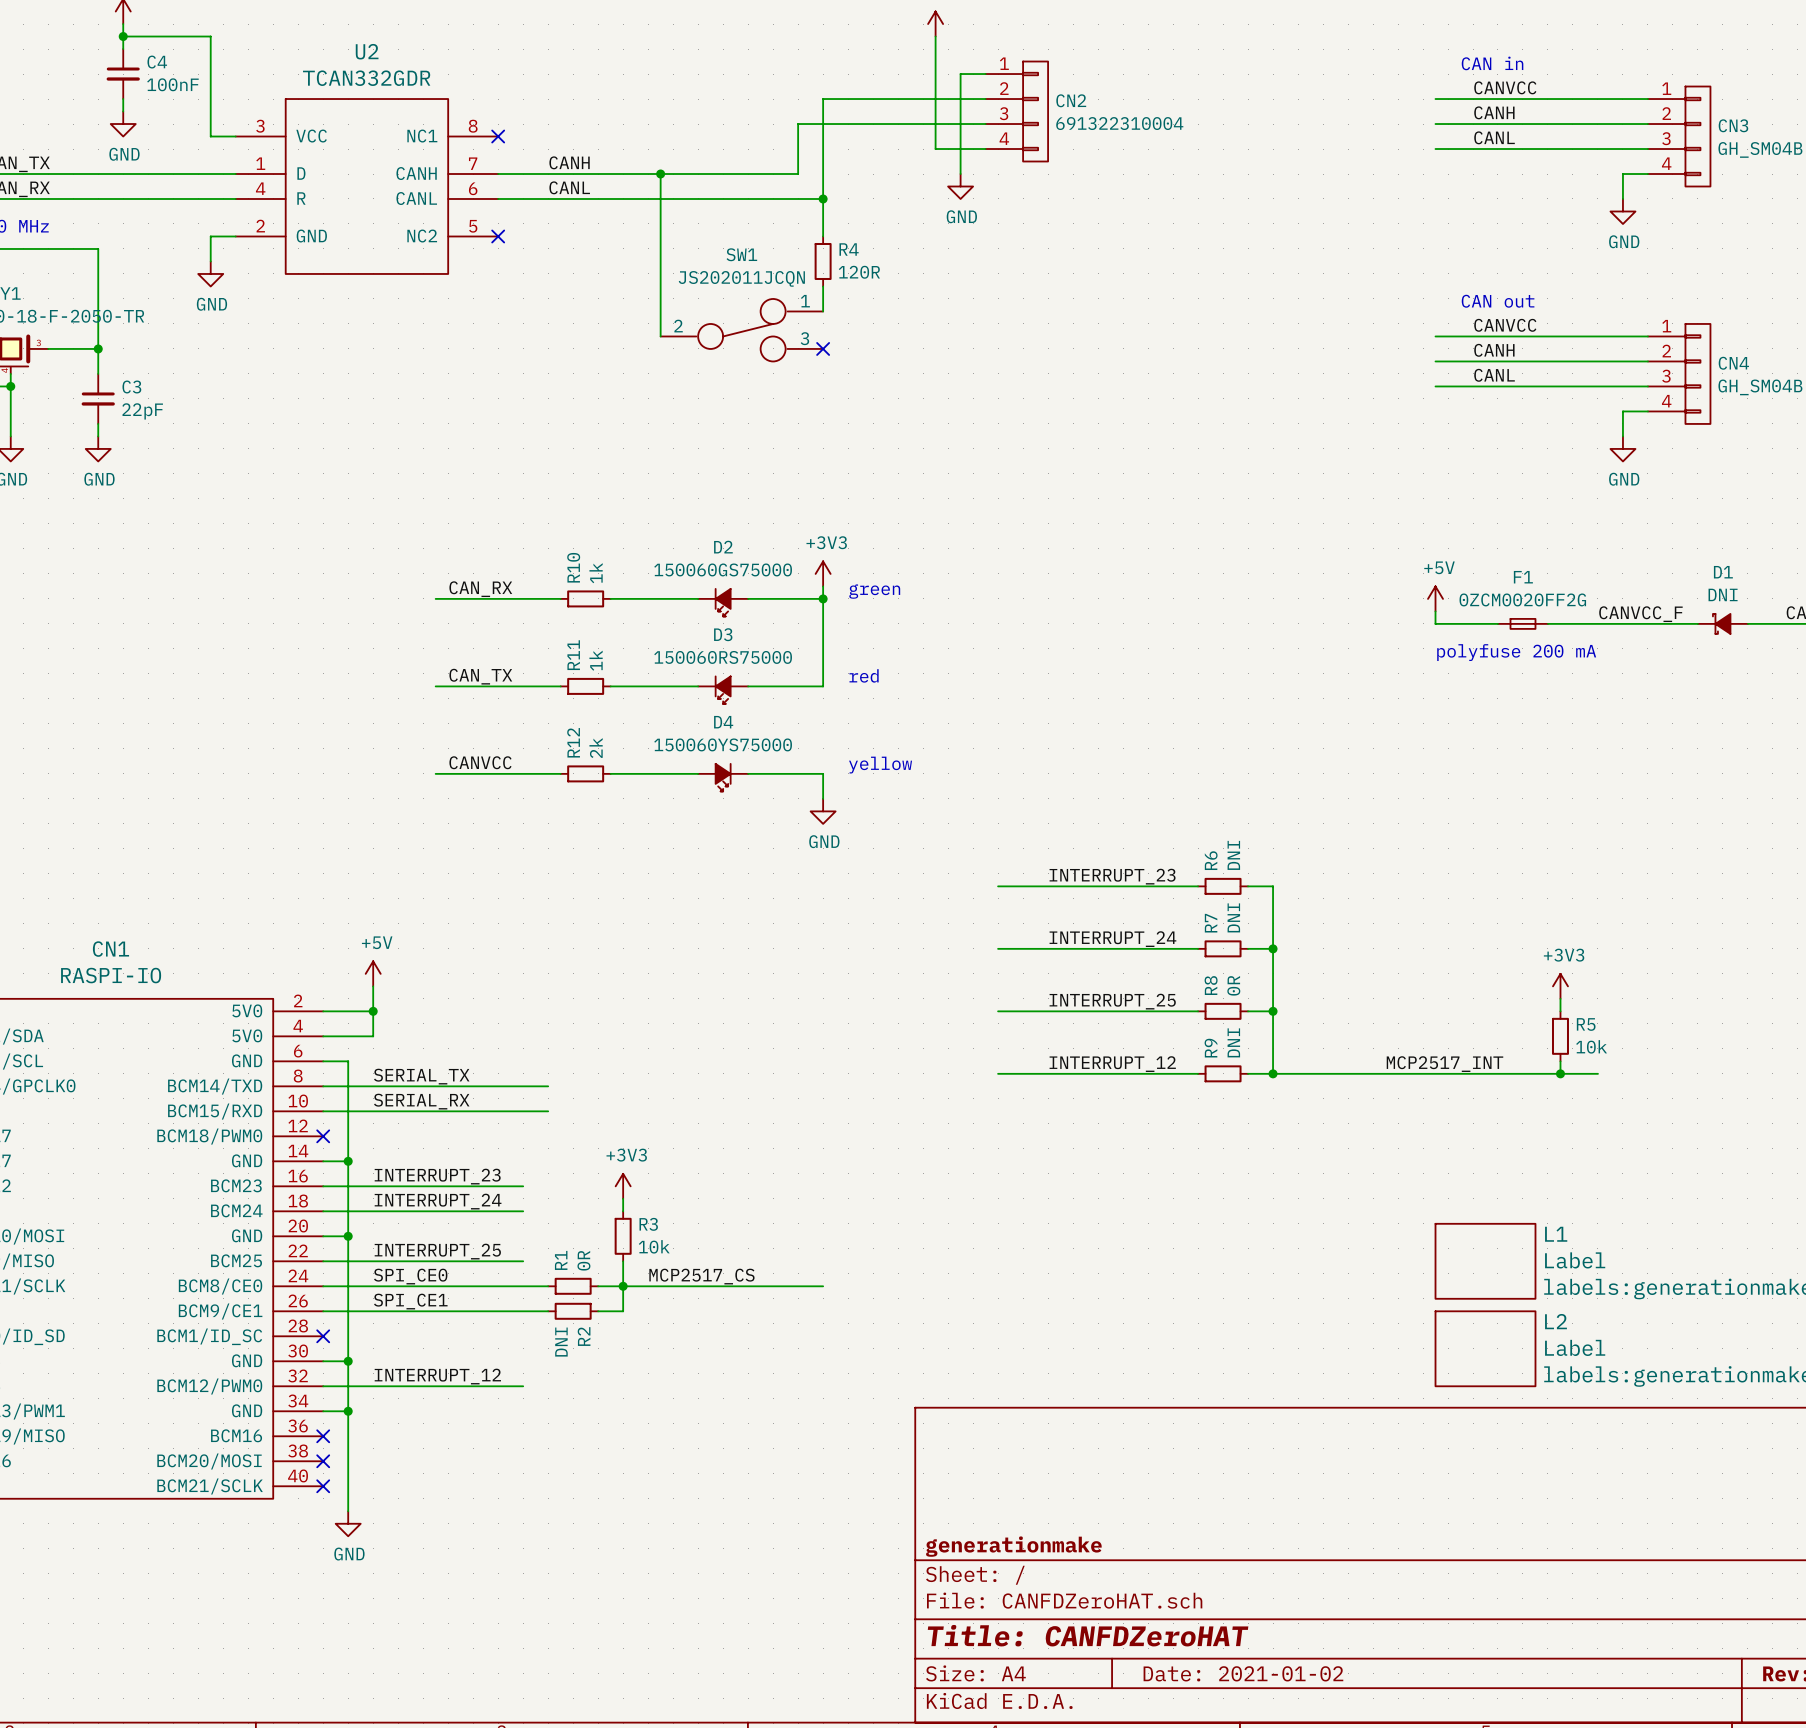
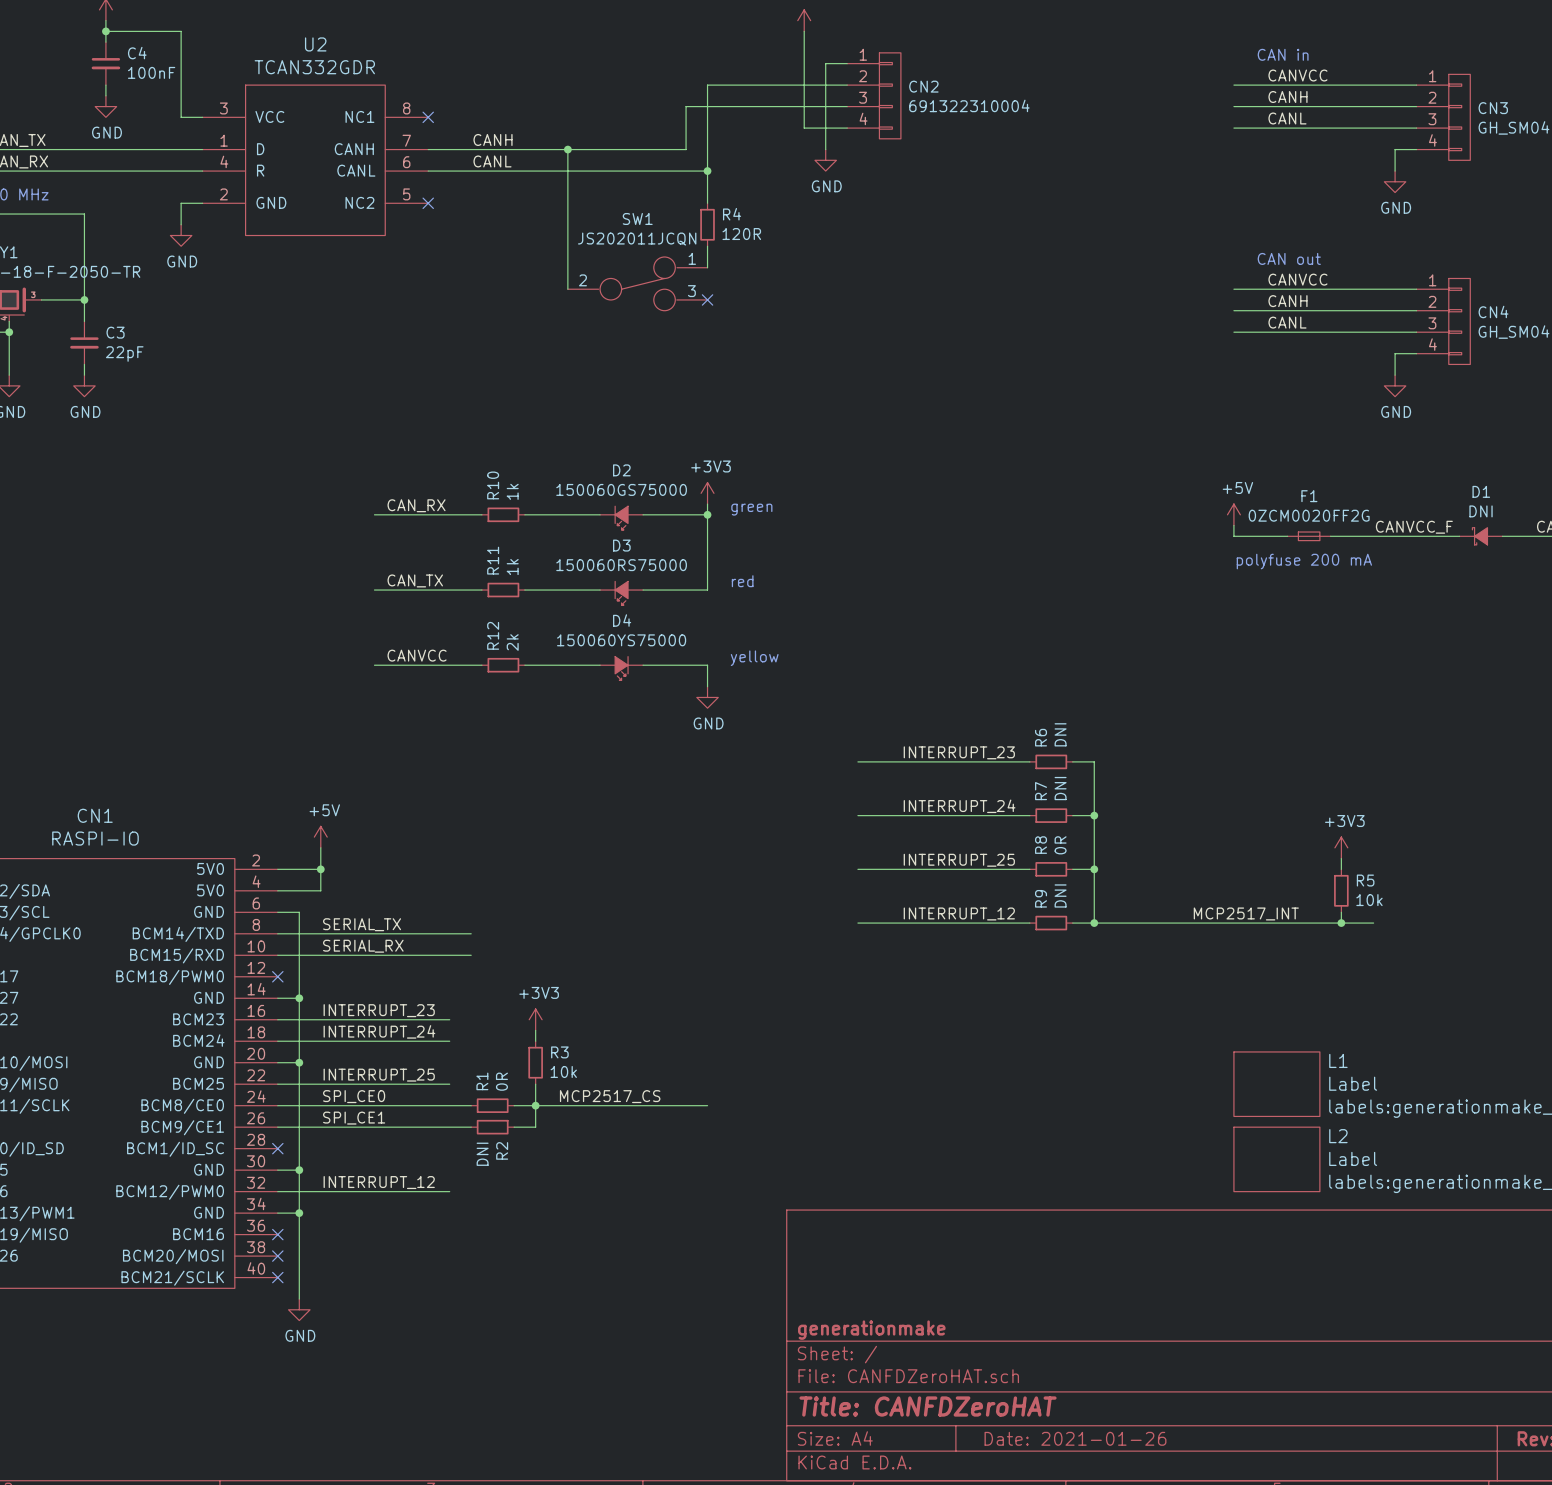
title block: Date: 2021-01-02 (1243, 1673) -> Date: 2021-01-26 (1075, 1438)

